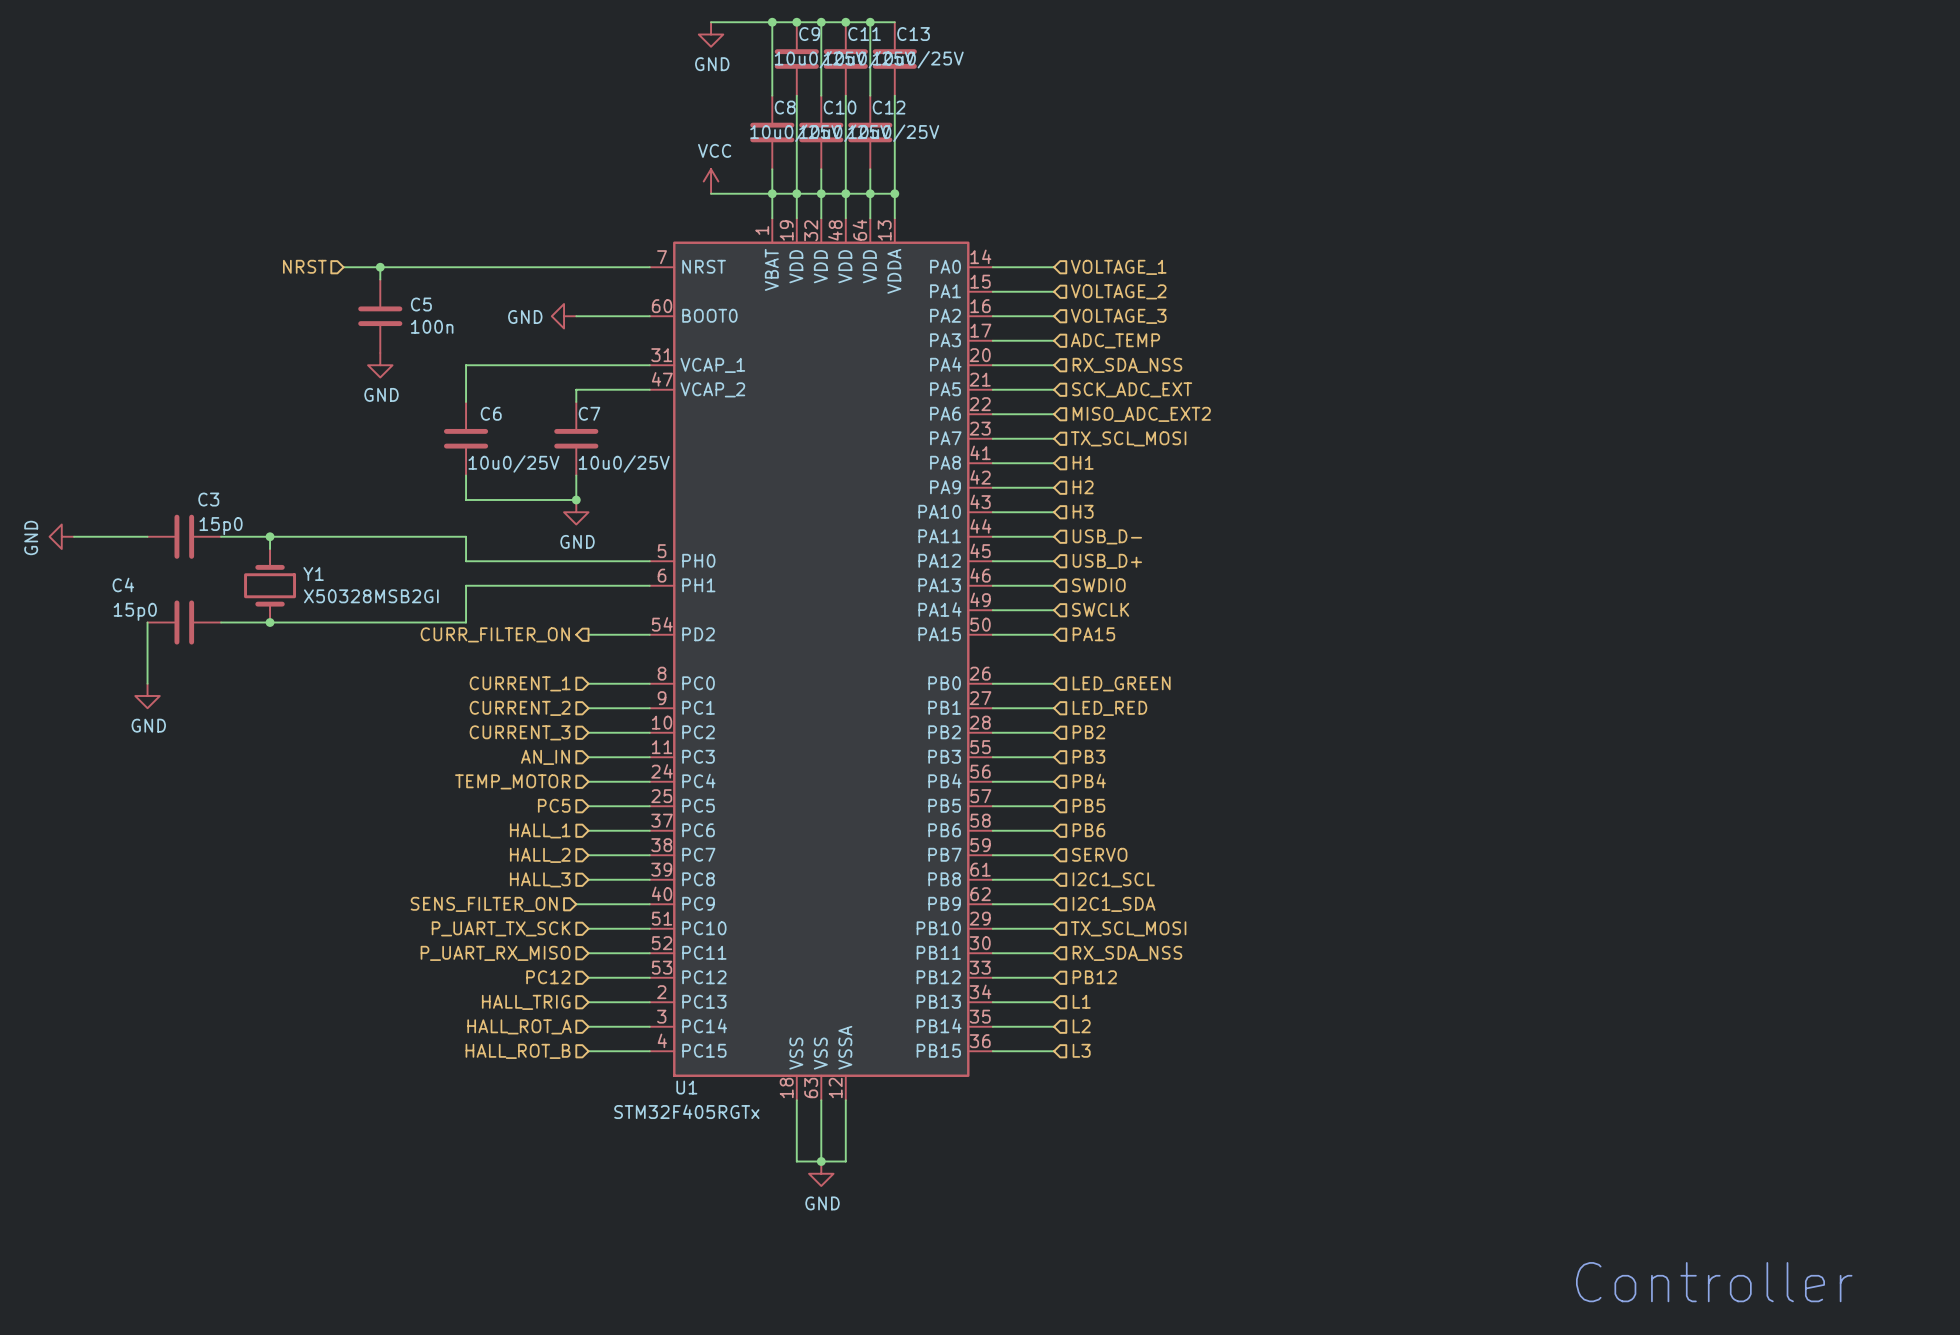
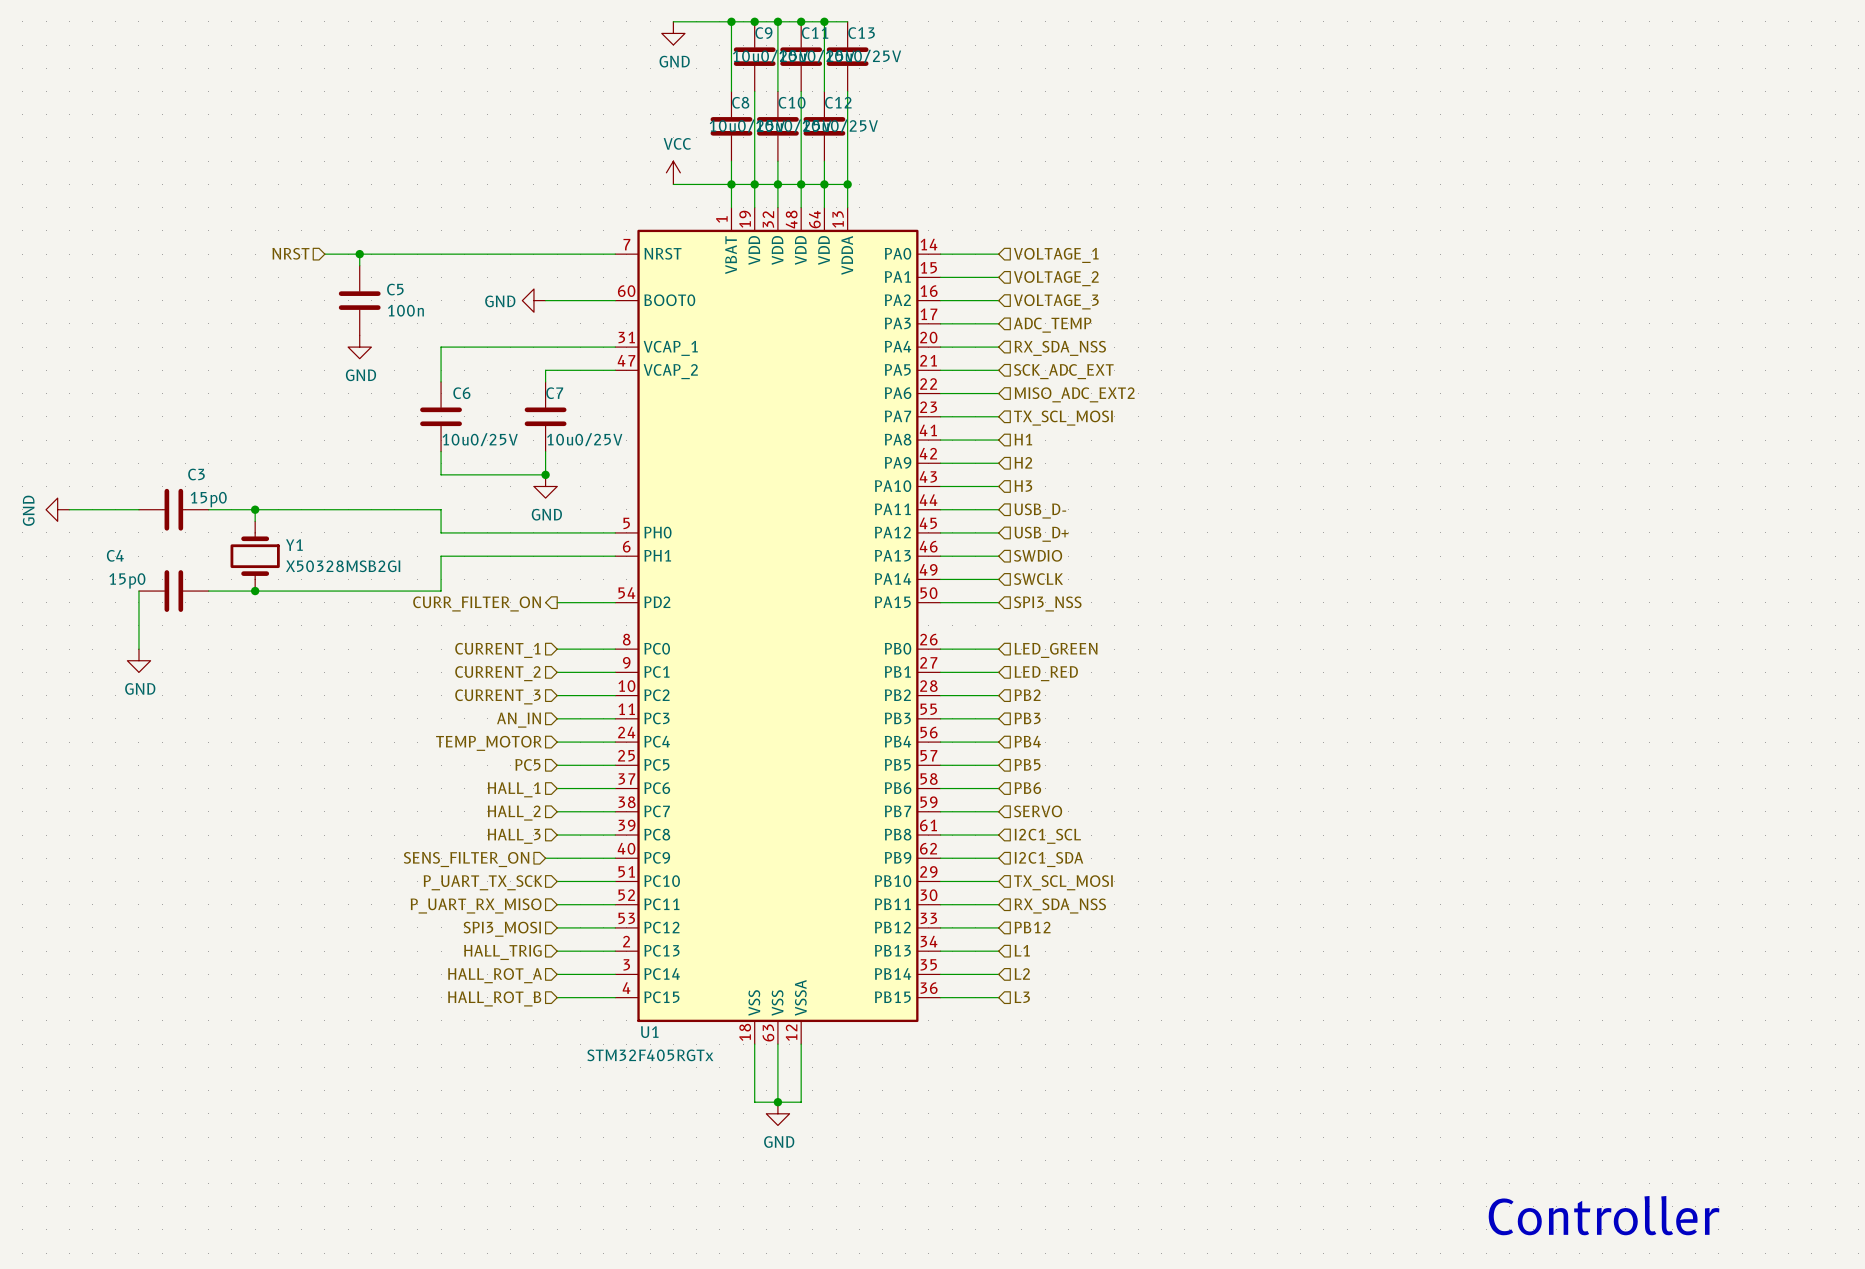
hierarchical label: PA15 (1093, 634) -> SPI3_NSS (1047, 603)
hierarchical label: PC12 (548, 977) -> SPI3_MOSI (502, 929)

